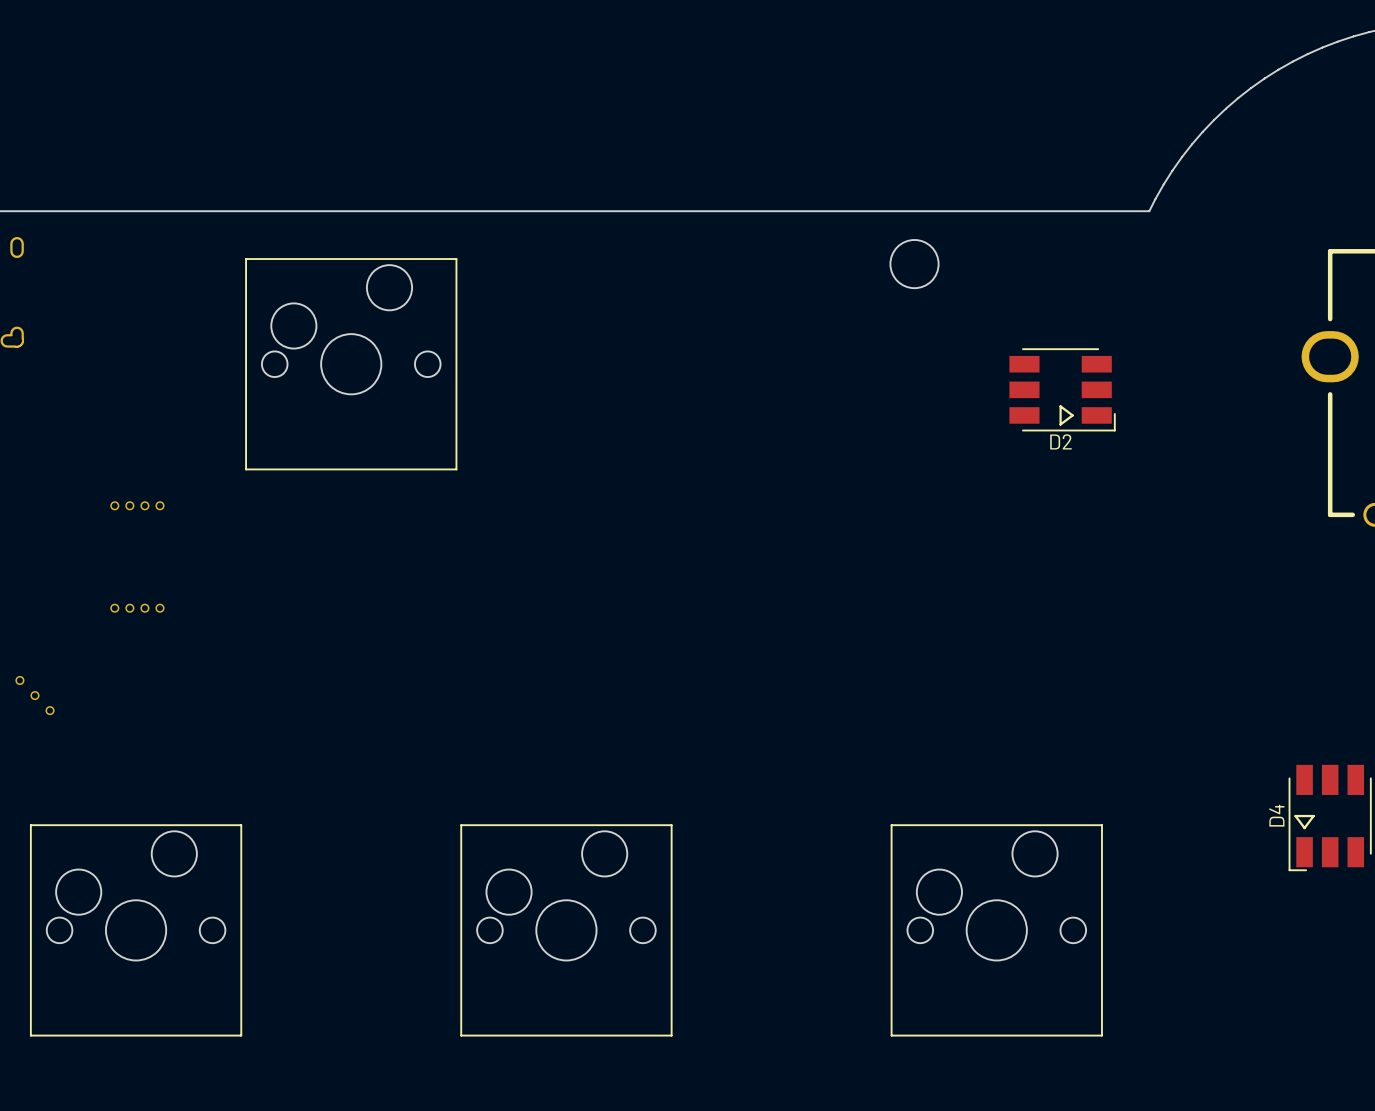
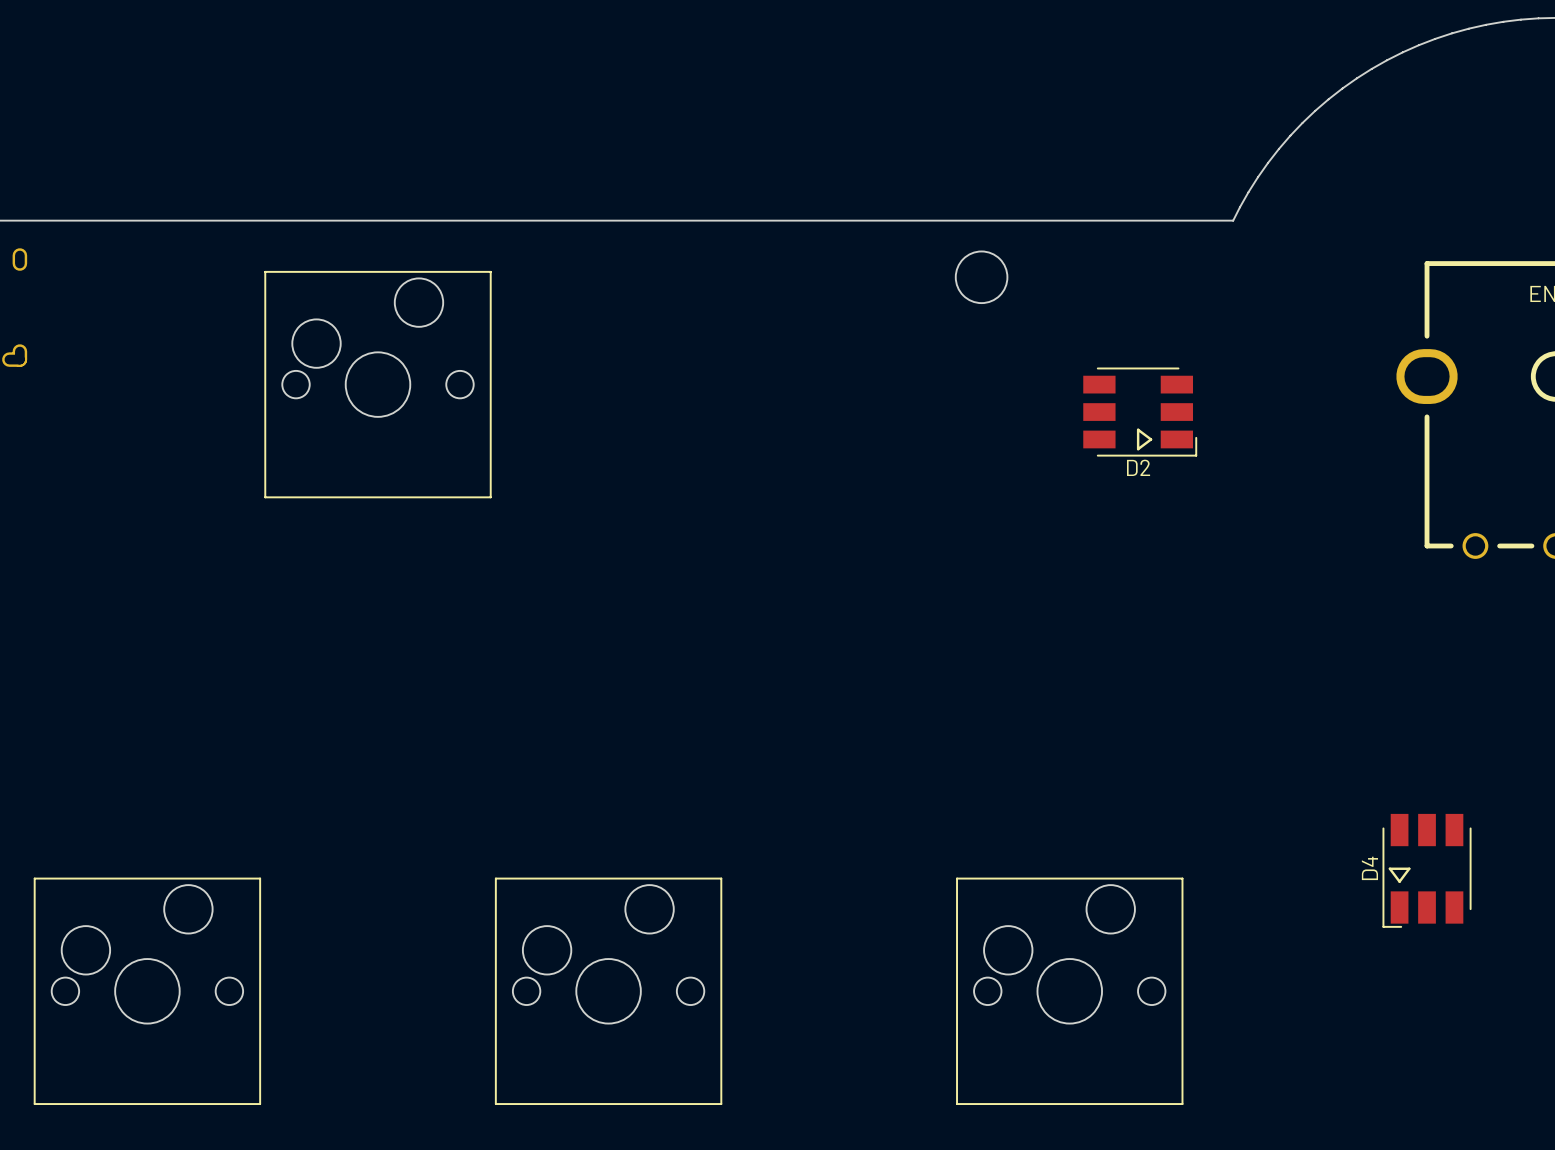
part: (114, 505) -> none
part: (129, 505) -> none
part: (144, 505) -> none
part: (159, 505) -> none
part: (114, 608) -> none
part: (129, 608) -> none
part: (144, 608) -> none
part: (159, 608) -> none
part: (19, 680) -> none
part: (34, 695) -> none
part: (50, 710) -> none

